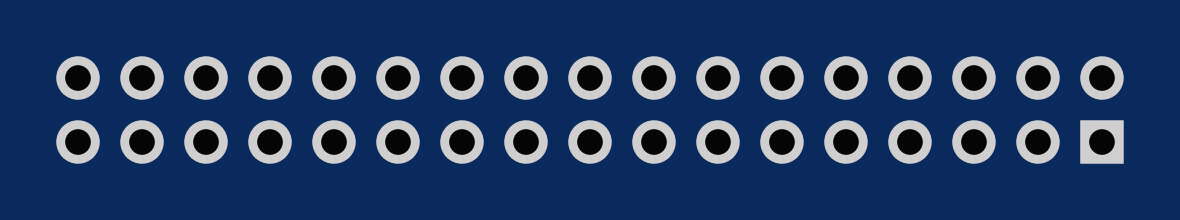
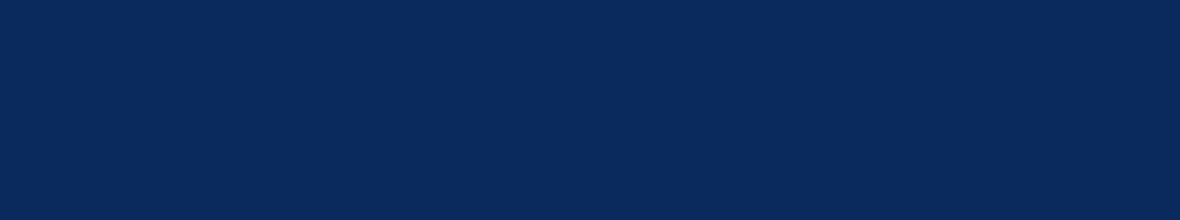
part: (589, 110) -> none

